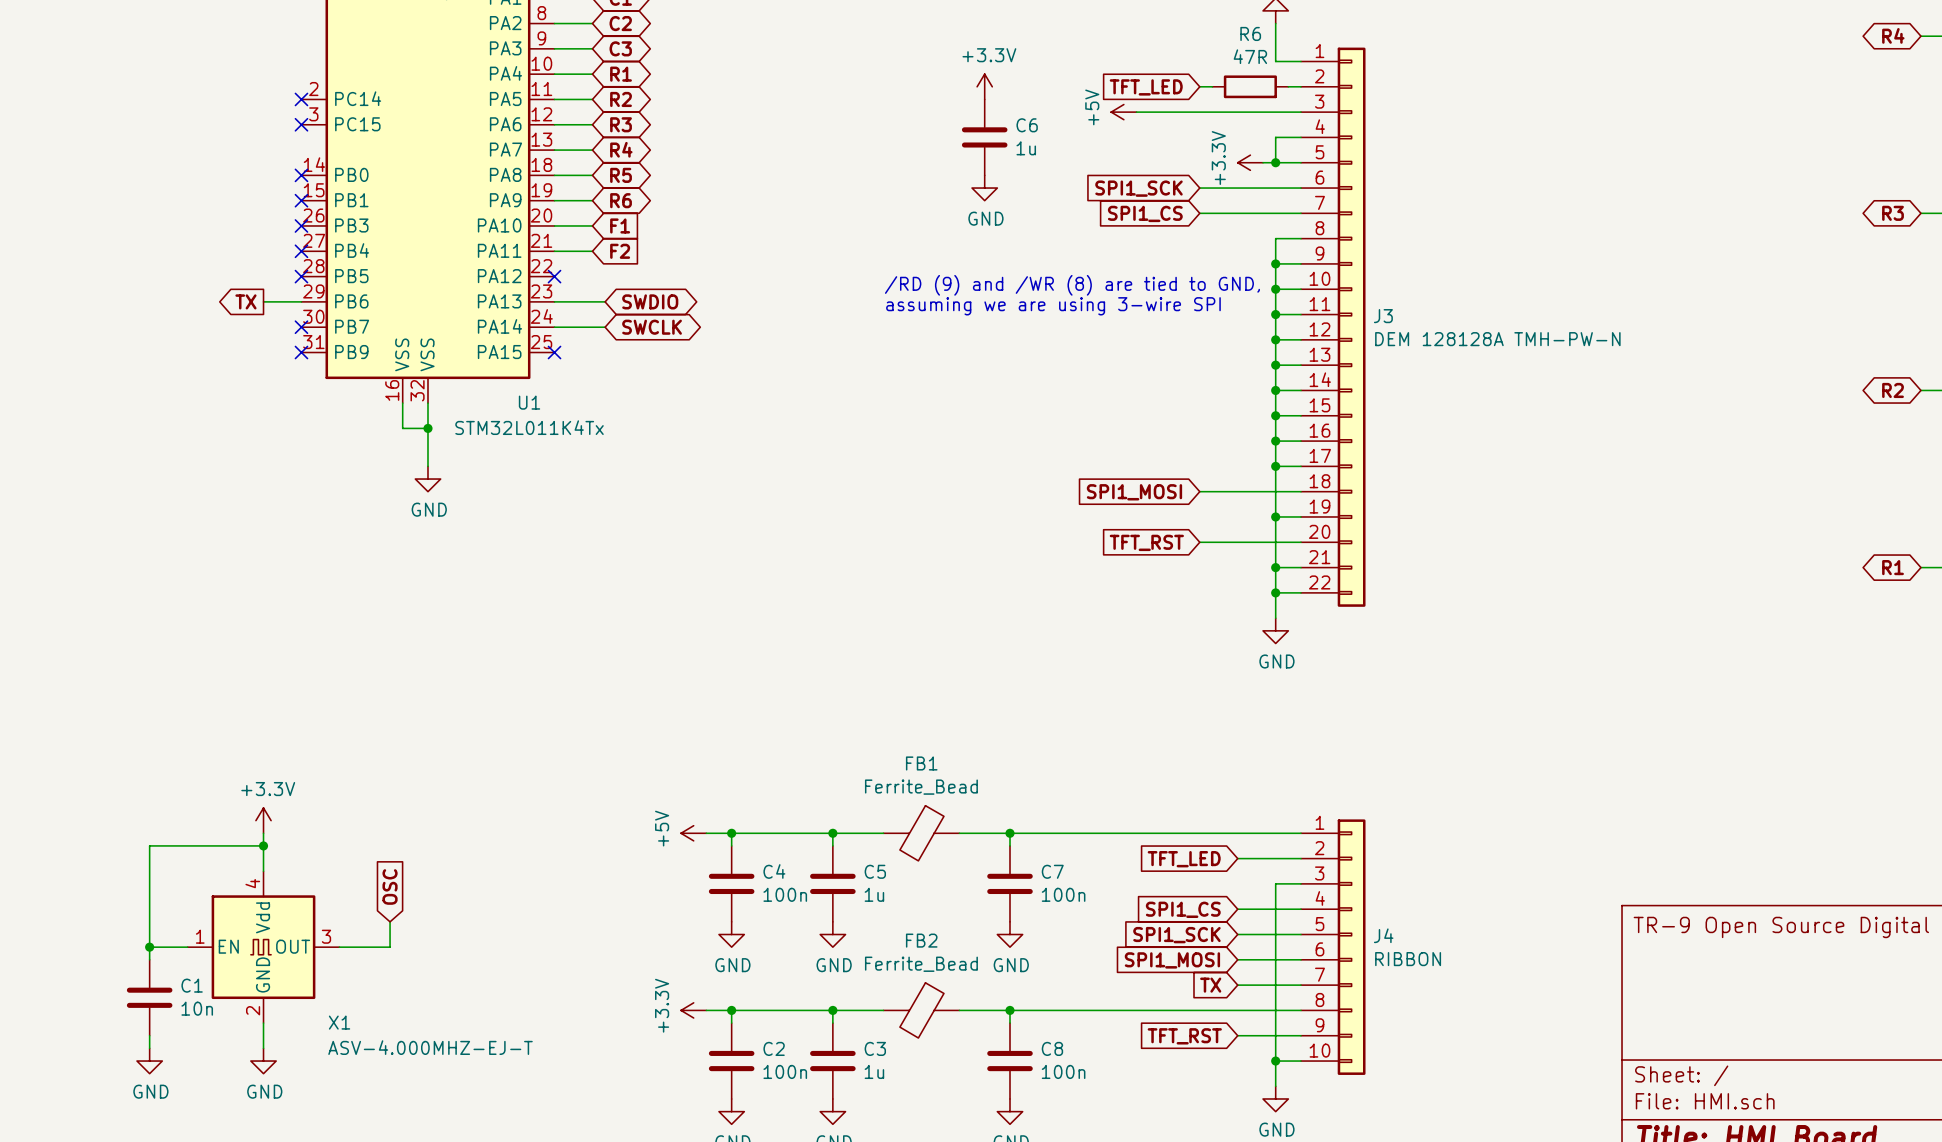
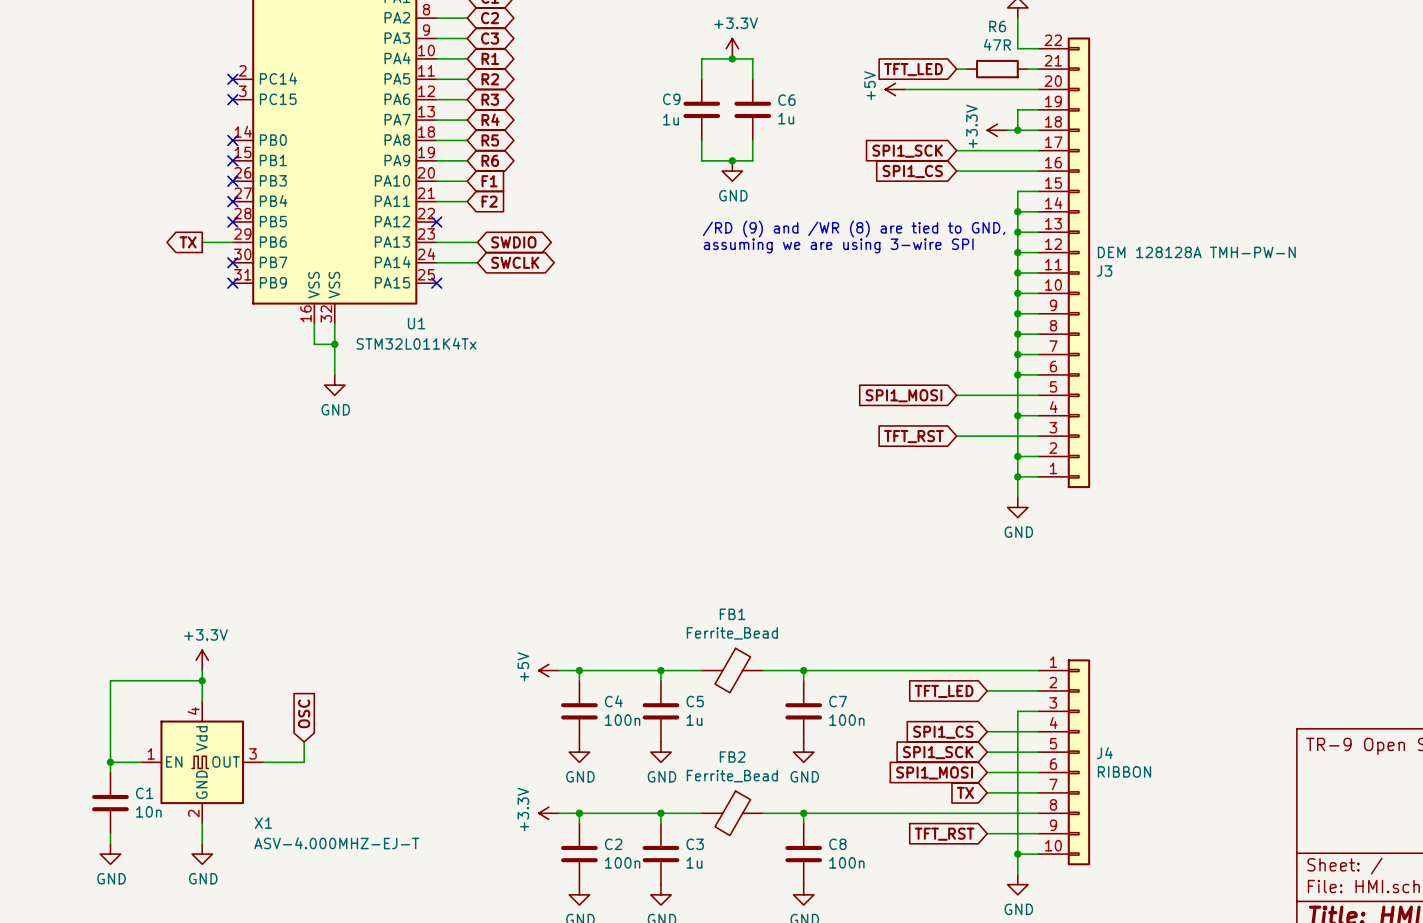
junction: none -> (732, 58)
power symbol position: +3.3V (984, 86) -> +3.3V (732, 48)
wire: none -> (701, 79) (701, 58) (752, 58) (752, 79)
C9: none -> 1u (701, 109)
C6 position: (984, 137) -> (752, 109)
wire: none -> (701, 140) (701, 160) (752, 160) (752, 140)
power symbol position: GND (984, 188) -> GND (732, 171)
junction: none -> (732, 160)
J3 flip: as is (1351, 327) -> up-down (1078, 262)

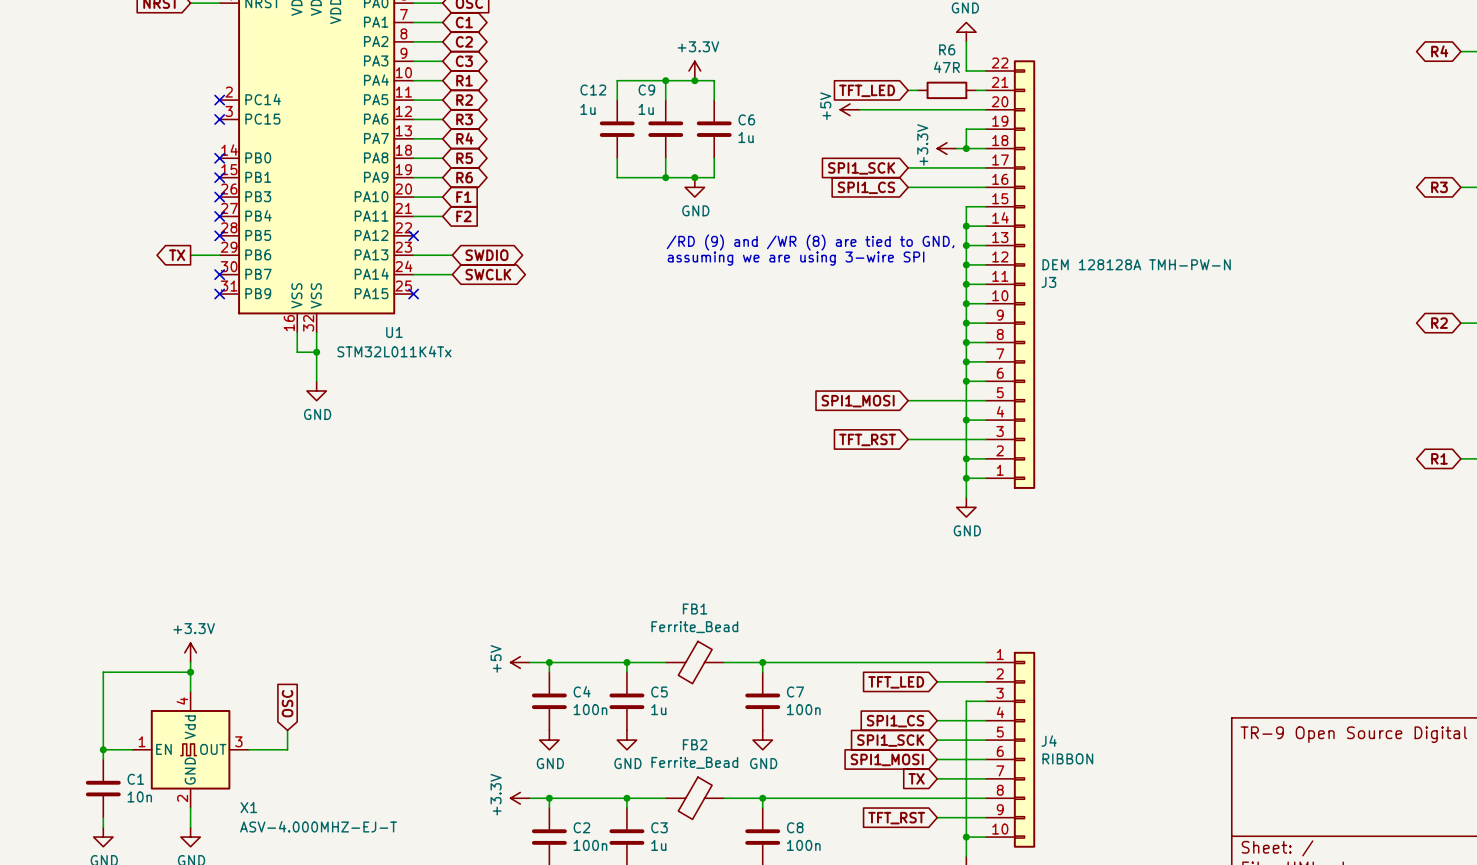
wire: none -> (665, 80) (617, 80) (617, 100)
junction: none -> (665, 80)
C9 name position: C9 (671, 99) -> C9 (646, 90)
C12: none -> 1u (617, 129)
C9 value position: 1u (671, 119) -> 1u (646, 109)
wire: none -> (617, 158) (617, 177) (665, 177)
junction: none -> (665, 177)

